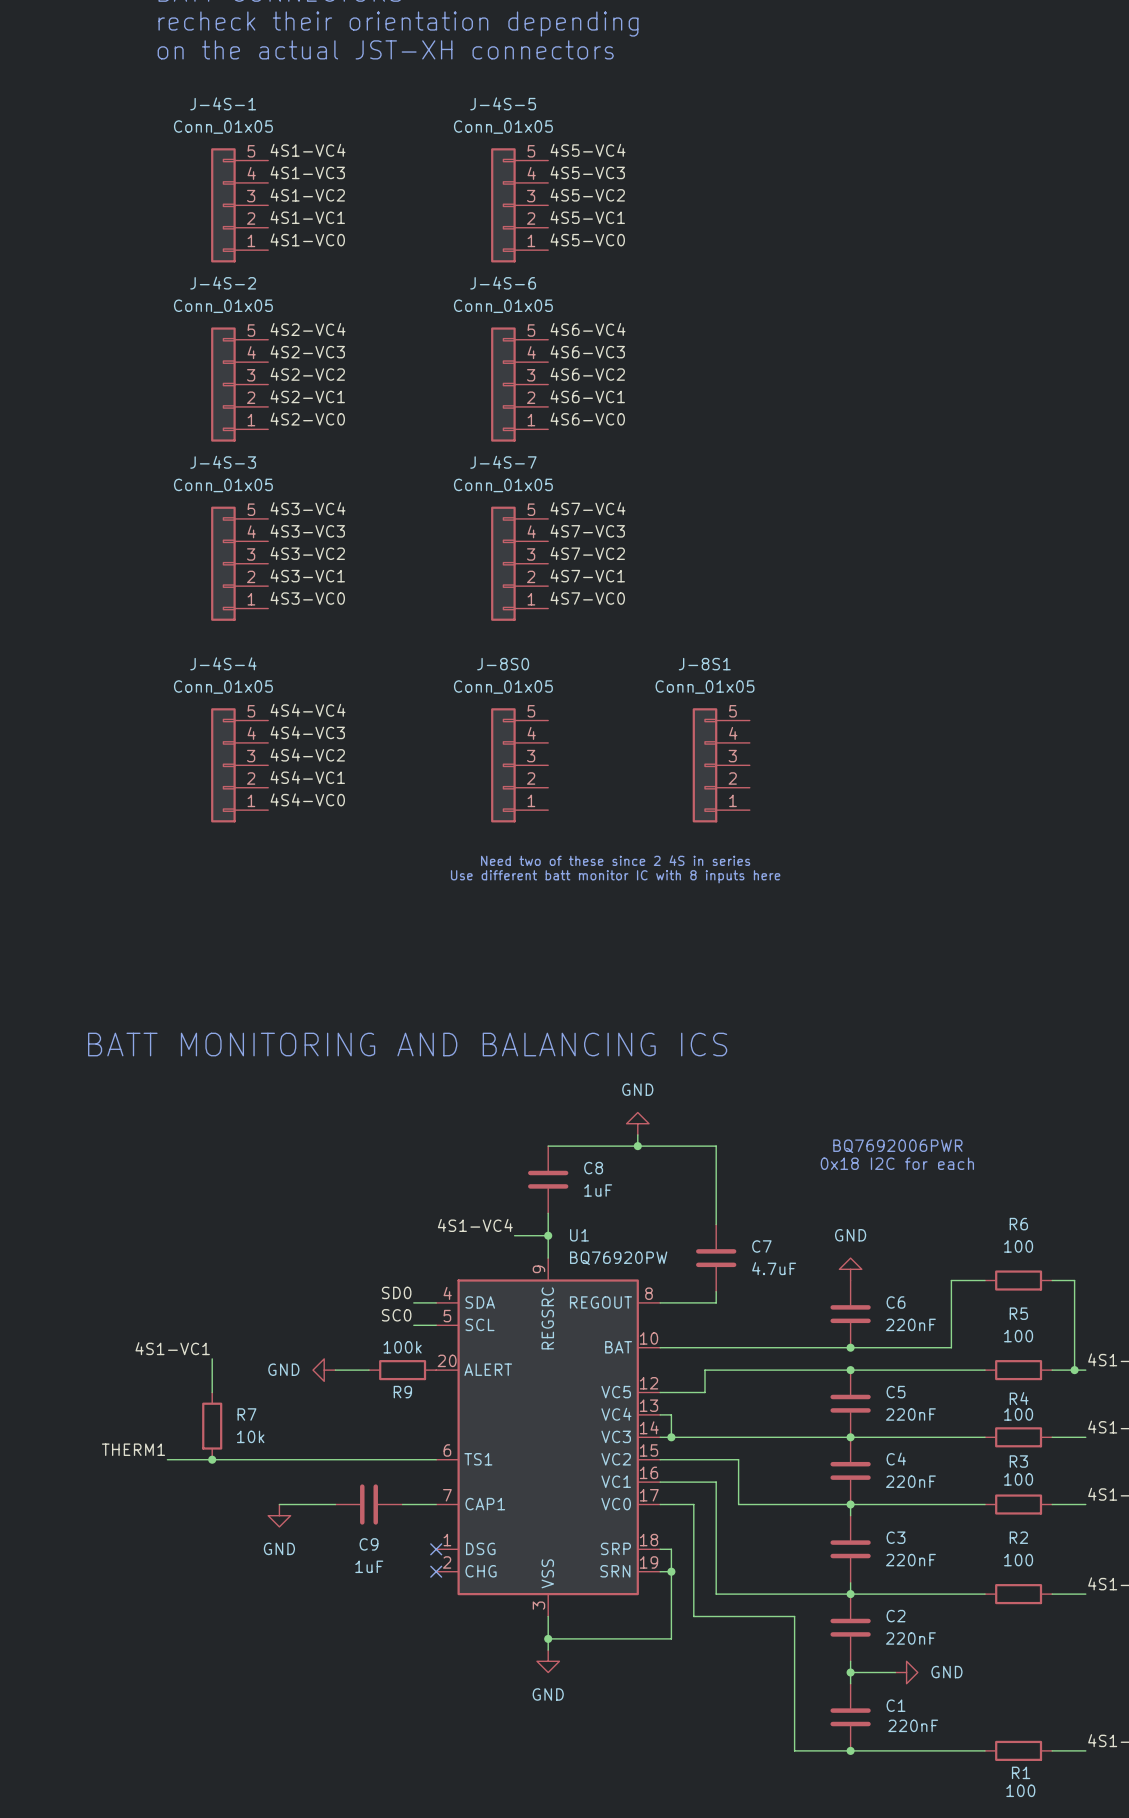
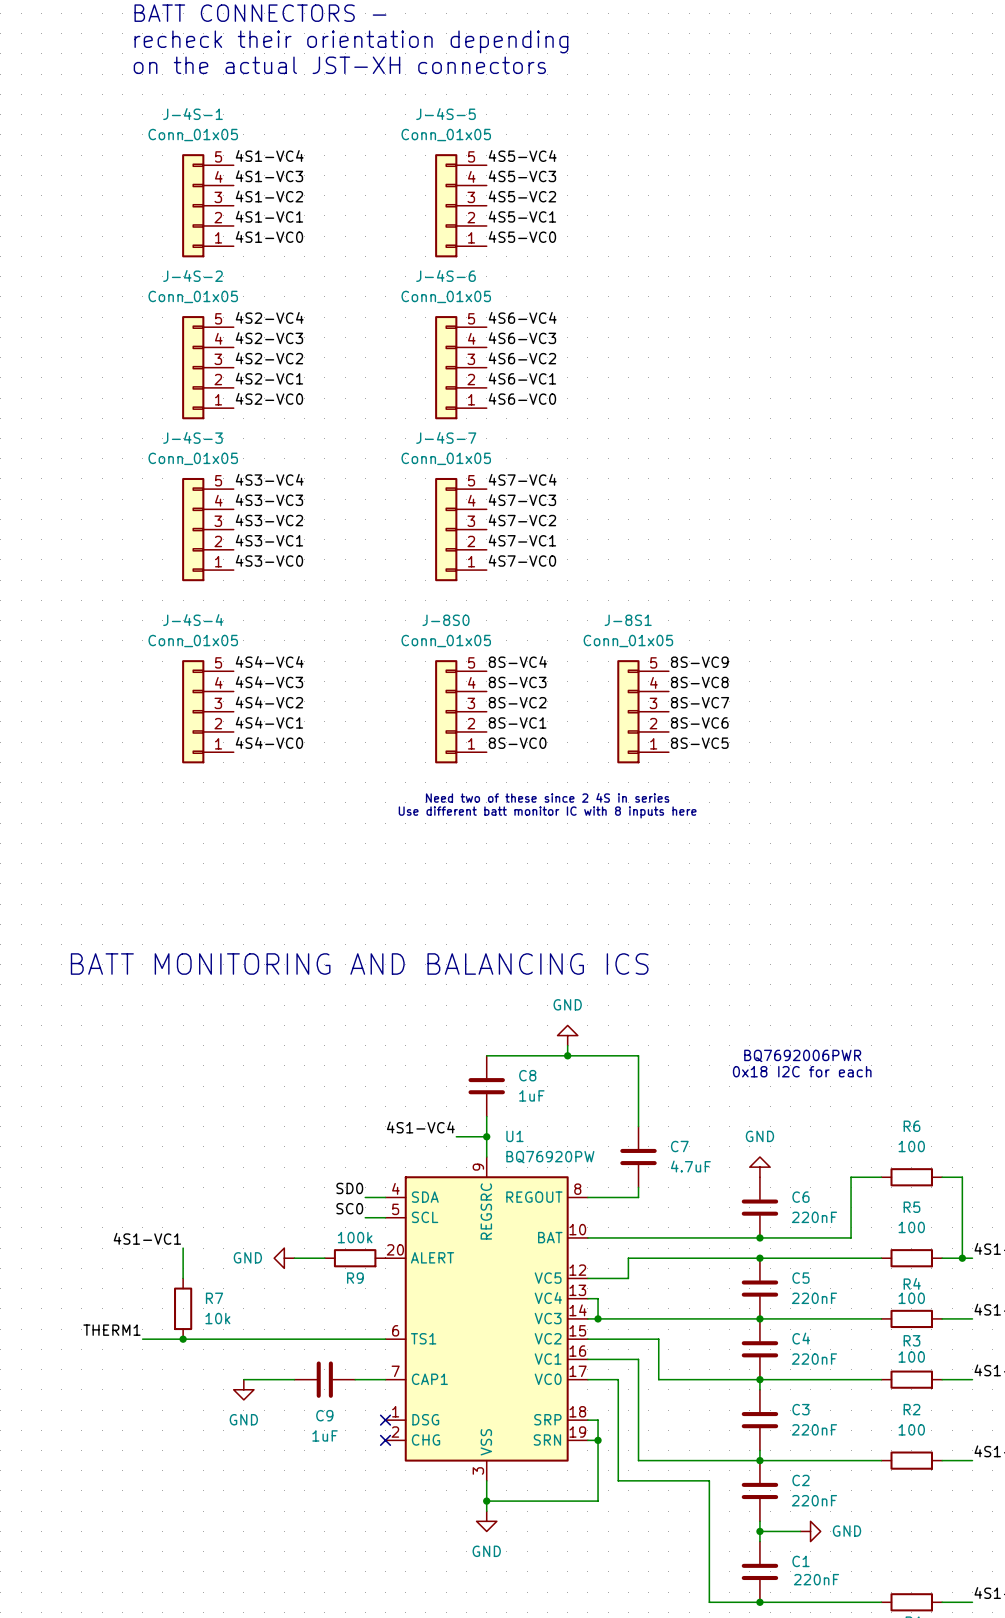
label: none -> 8S-VC4 (517, 661)
label: none -> 8S-VC9 (699, 662)
label: none -> 8S-VC3 (517, 682)
label: none -> 8S-VC8 (699, 682)
label: none -> 8S-VC2 (517, 702)
label: none -> 8S-VC7 (700, 702)
label: none -> 8S-VC1 (517, 722)
label: none -> 8S-VC6 (699, 722)
label: none -> 8S-VC0 (517, 743)
label: none -> 8S-VC5 (699, 743)

